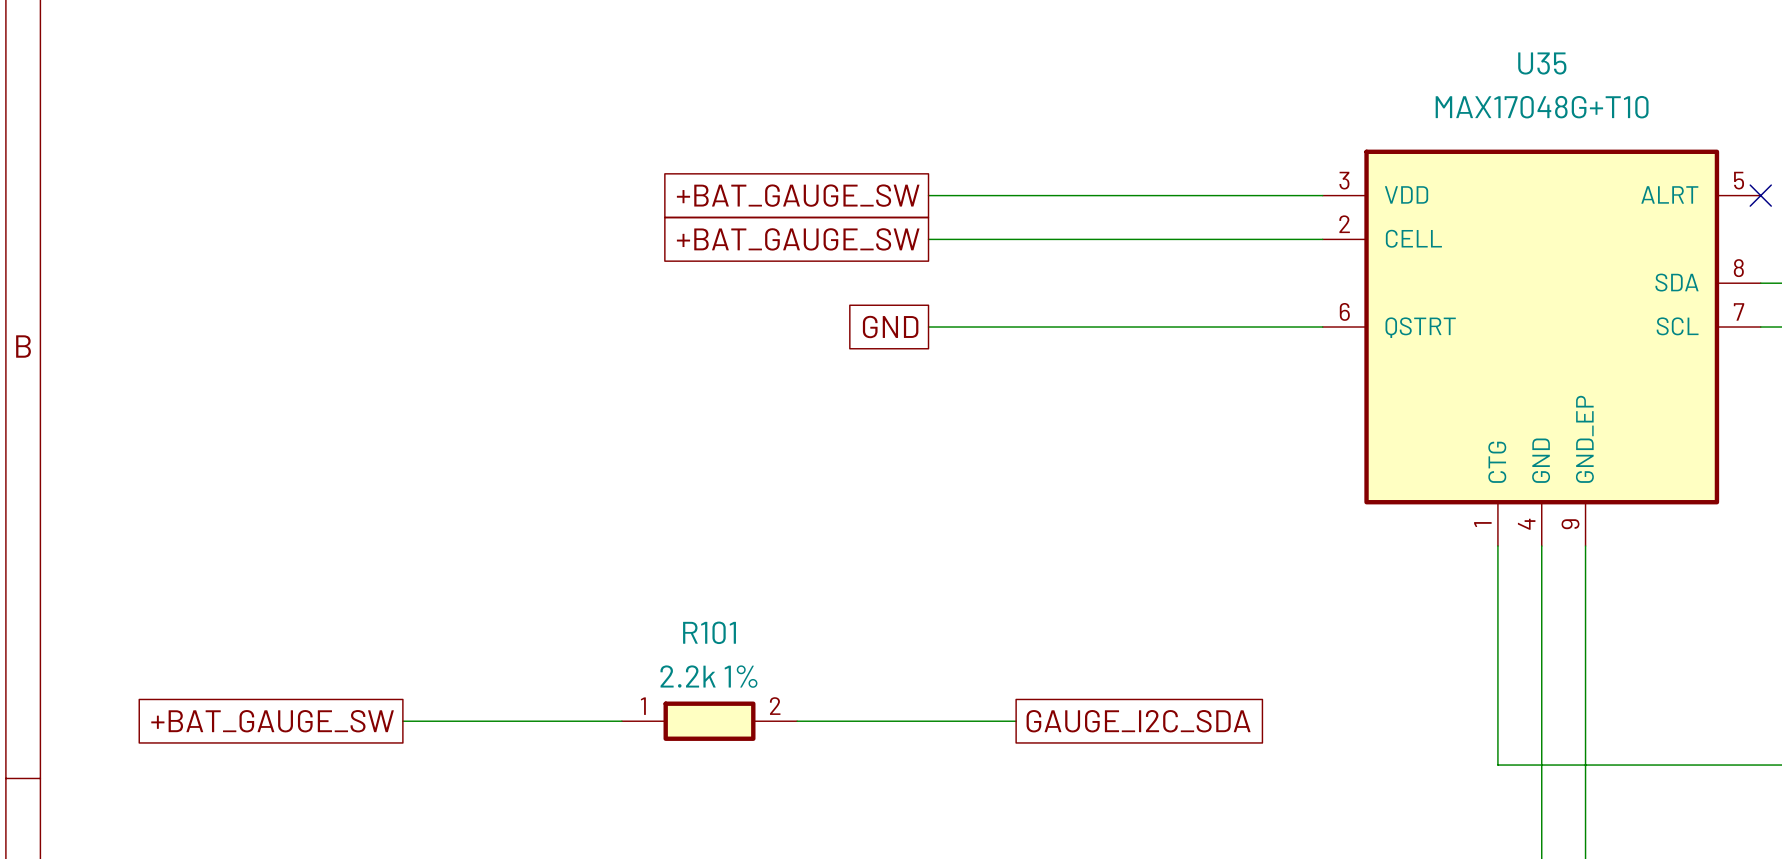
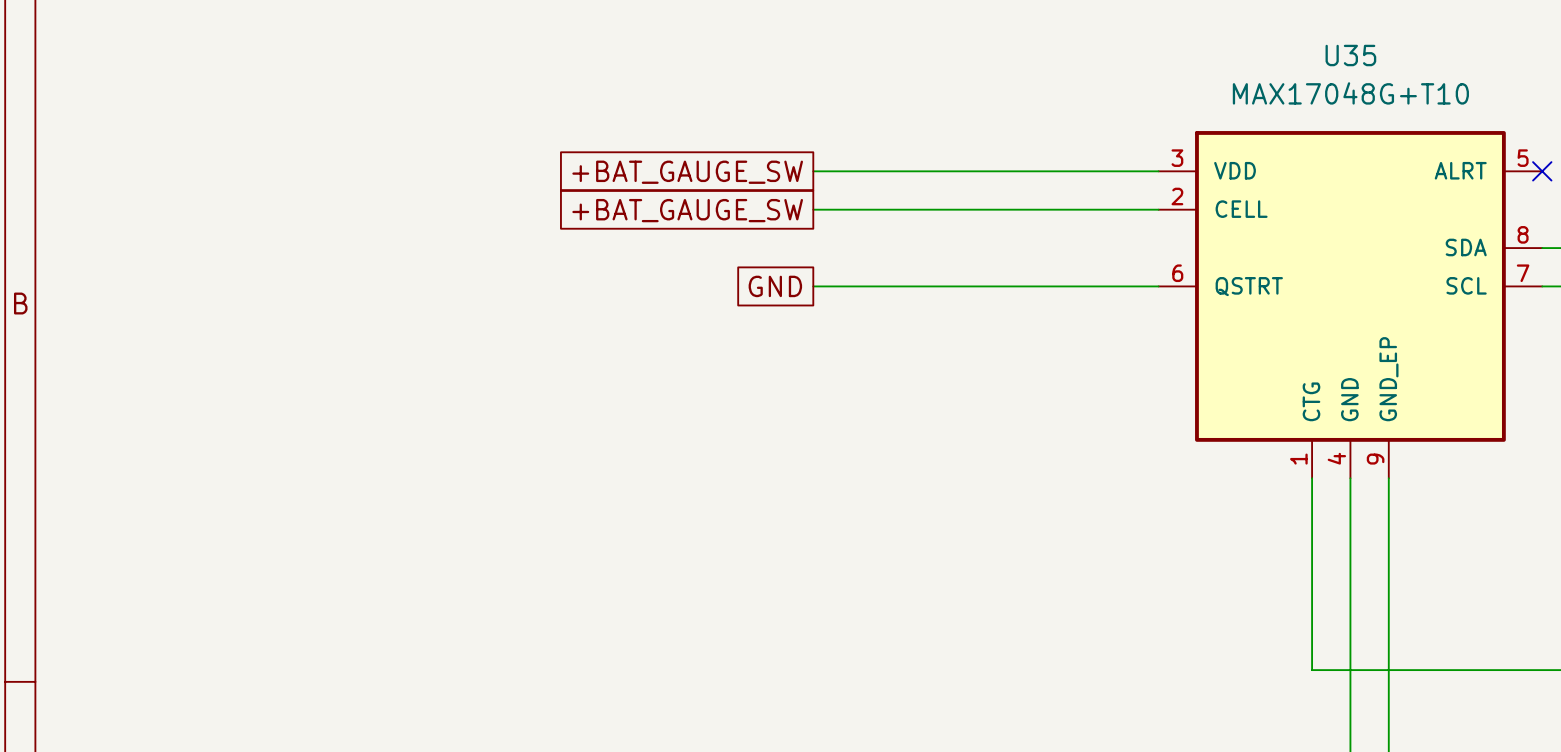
global label: +BAT_GAUGE_SW (272, 721) -> none
wire: (402, 721) (621, 721) -> none
R101: 2.2k 1% (709, 721) -> none
wire: (797, 721) (1016, 721) -> none
global label: GAUGE_I2C_SDA (1138, 721) -> none

